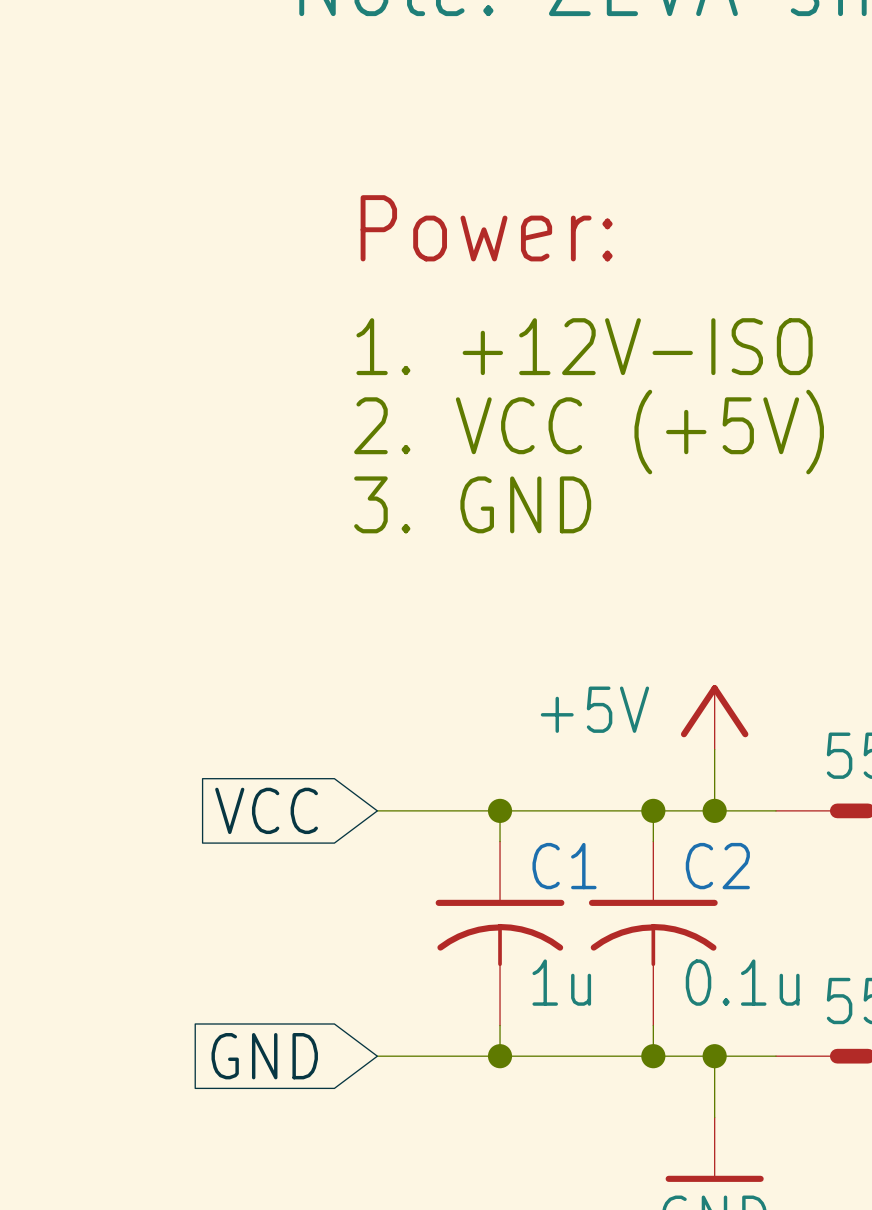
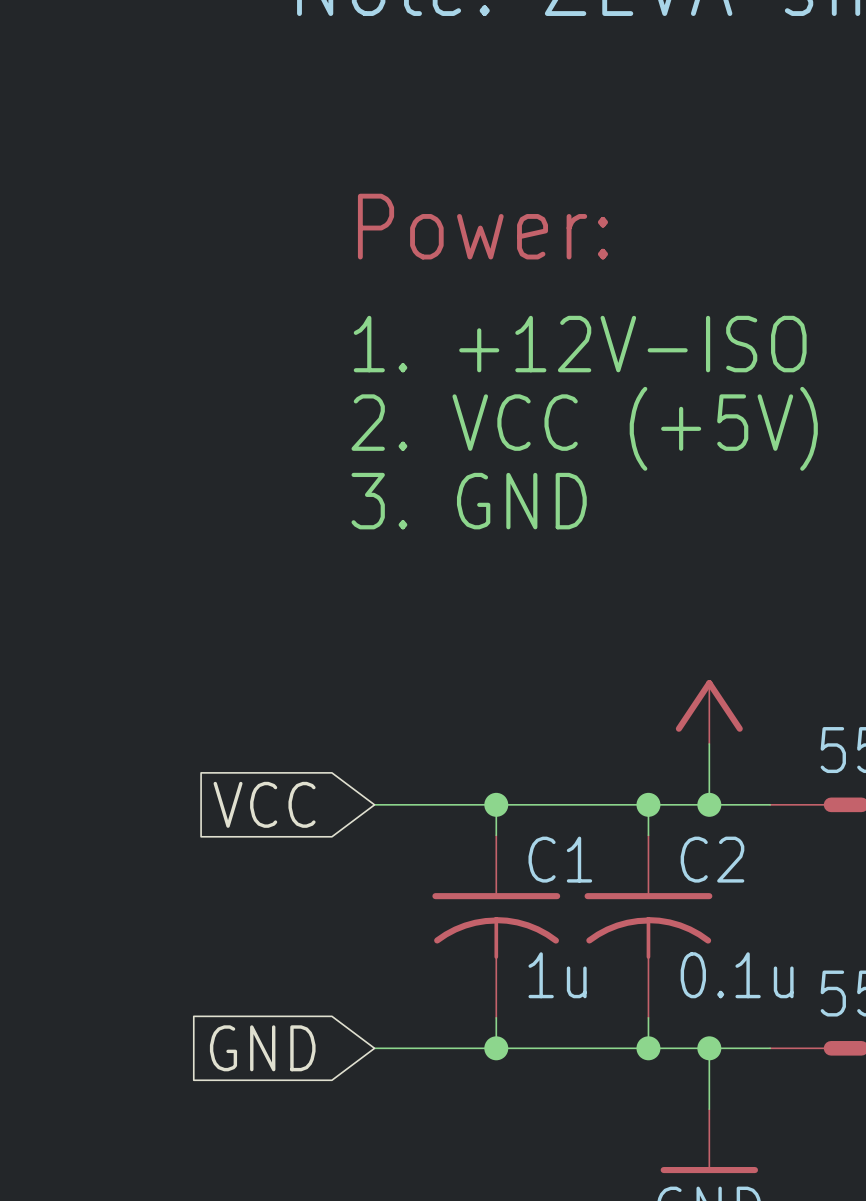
power symbol text: +5V (594, 709) -> none

